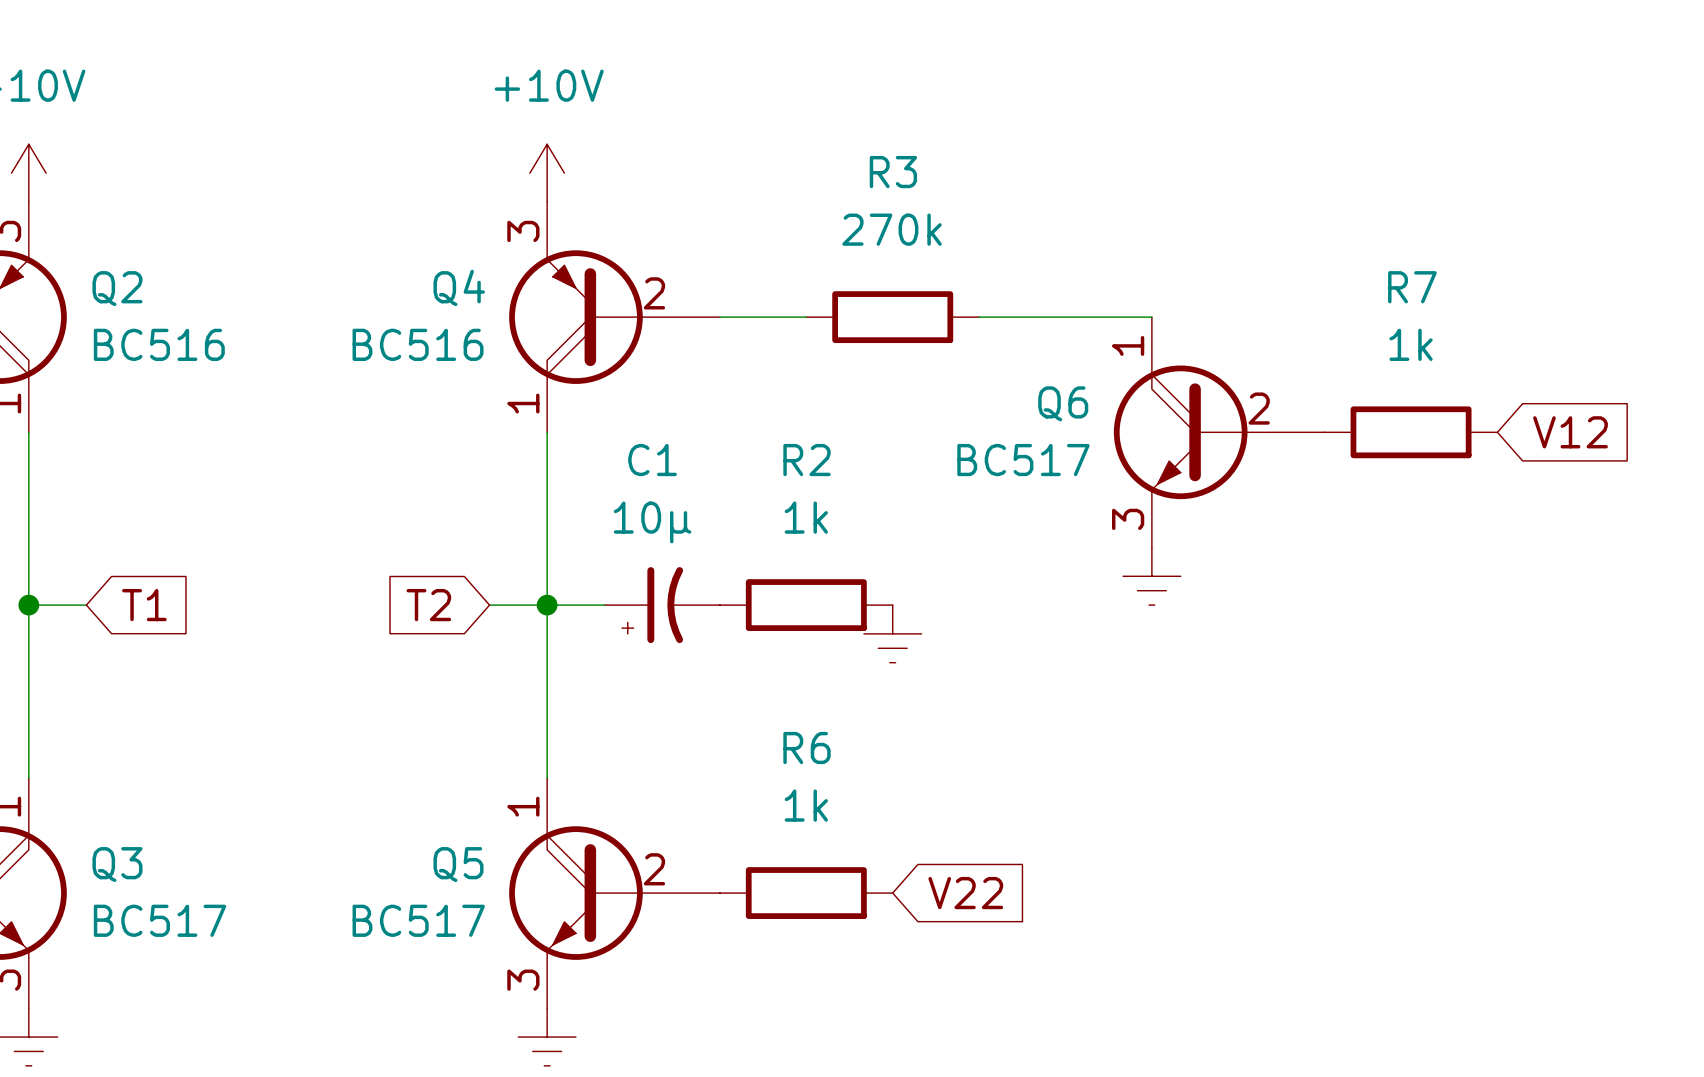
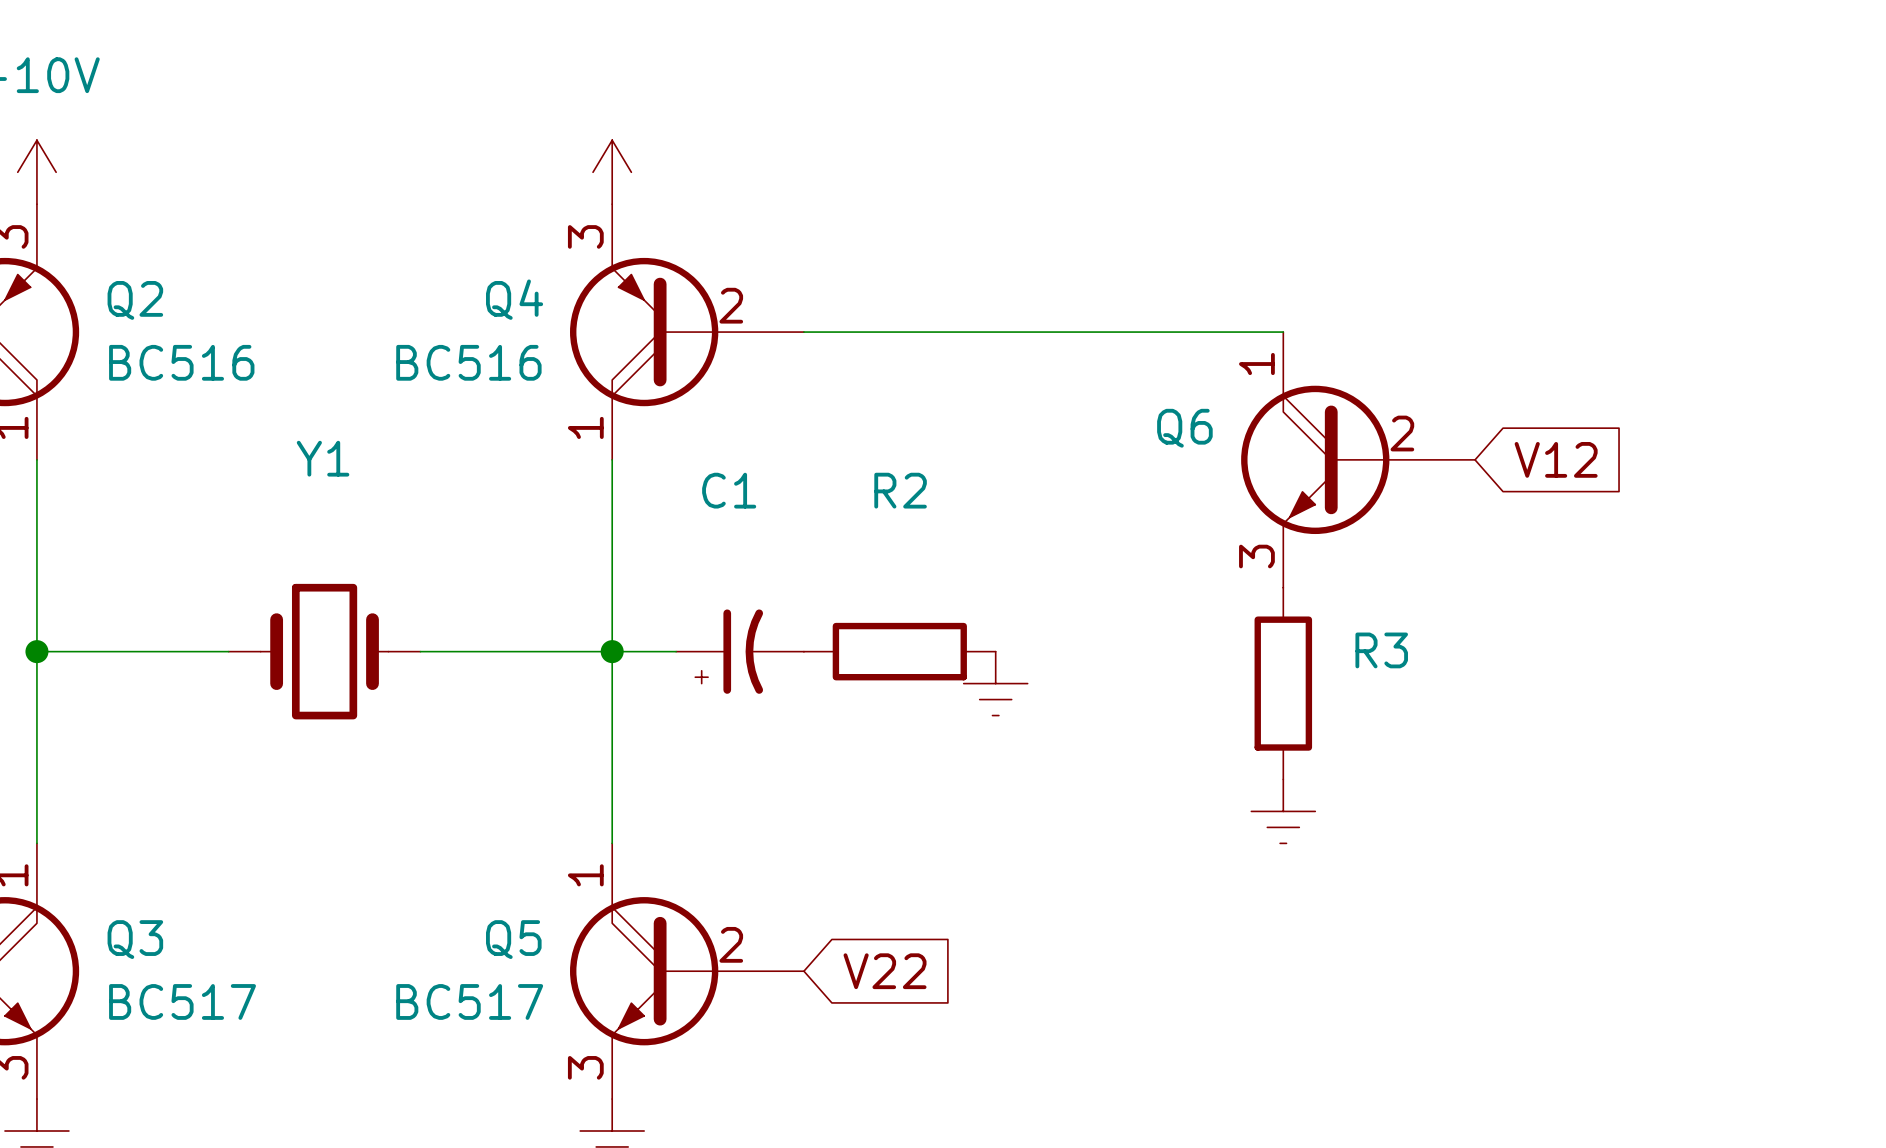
power symbol text: +10V (549, 85) -> none
R3 name position: R3 (893, 172) -> R3 (1381, 650)
R3 value: 270k (892, 229) -> none
wire: none -> (899, 332) (1091, 332)
R3 rotation: 0° (892, 317) -> 90° clockwise (1283, 683)
R3 position: (892, 317) -> (1283, 683)
R7: 1k (1411, 432) -> none
global label position: V12 (1570, 432) -> V12 (1556, 459)
Q6 value: BC517 (1023, 460) -> none
R2 value: 1k (806, 517) -> none
C1 value: 10μ (652, 522) -> none
power symbol position: (1151, 576) -> (1283, 811)
wire: none -> (100, 651) (228, 651)
global label: T1 (144, 605) -> none
Y1: none -> (324, 651)
wire: none -> (420, 651) (548, 651)
global label: T2 (428, 605) -> none
R6: 1k (806, 893) -> none
global label position: V22 (965, 893) -> V22 (885, 971)

